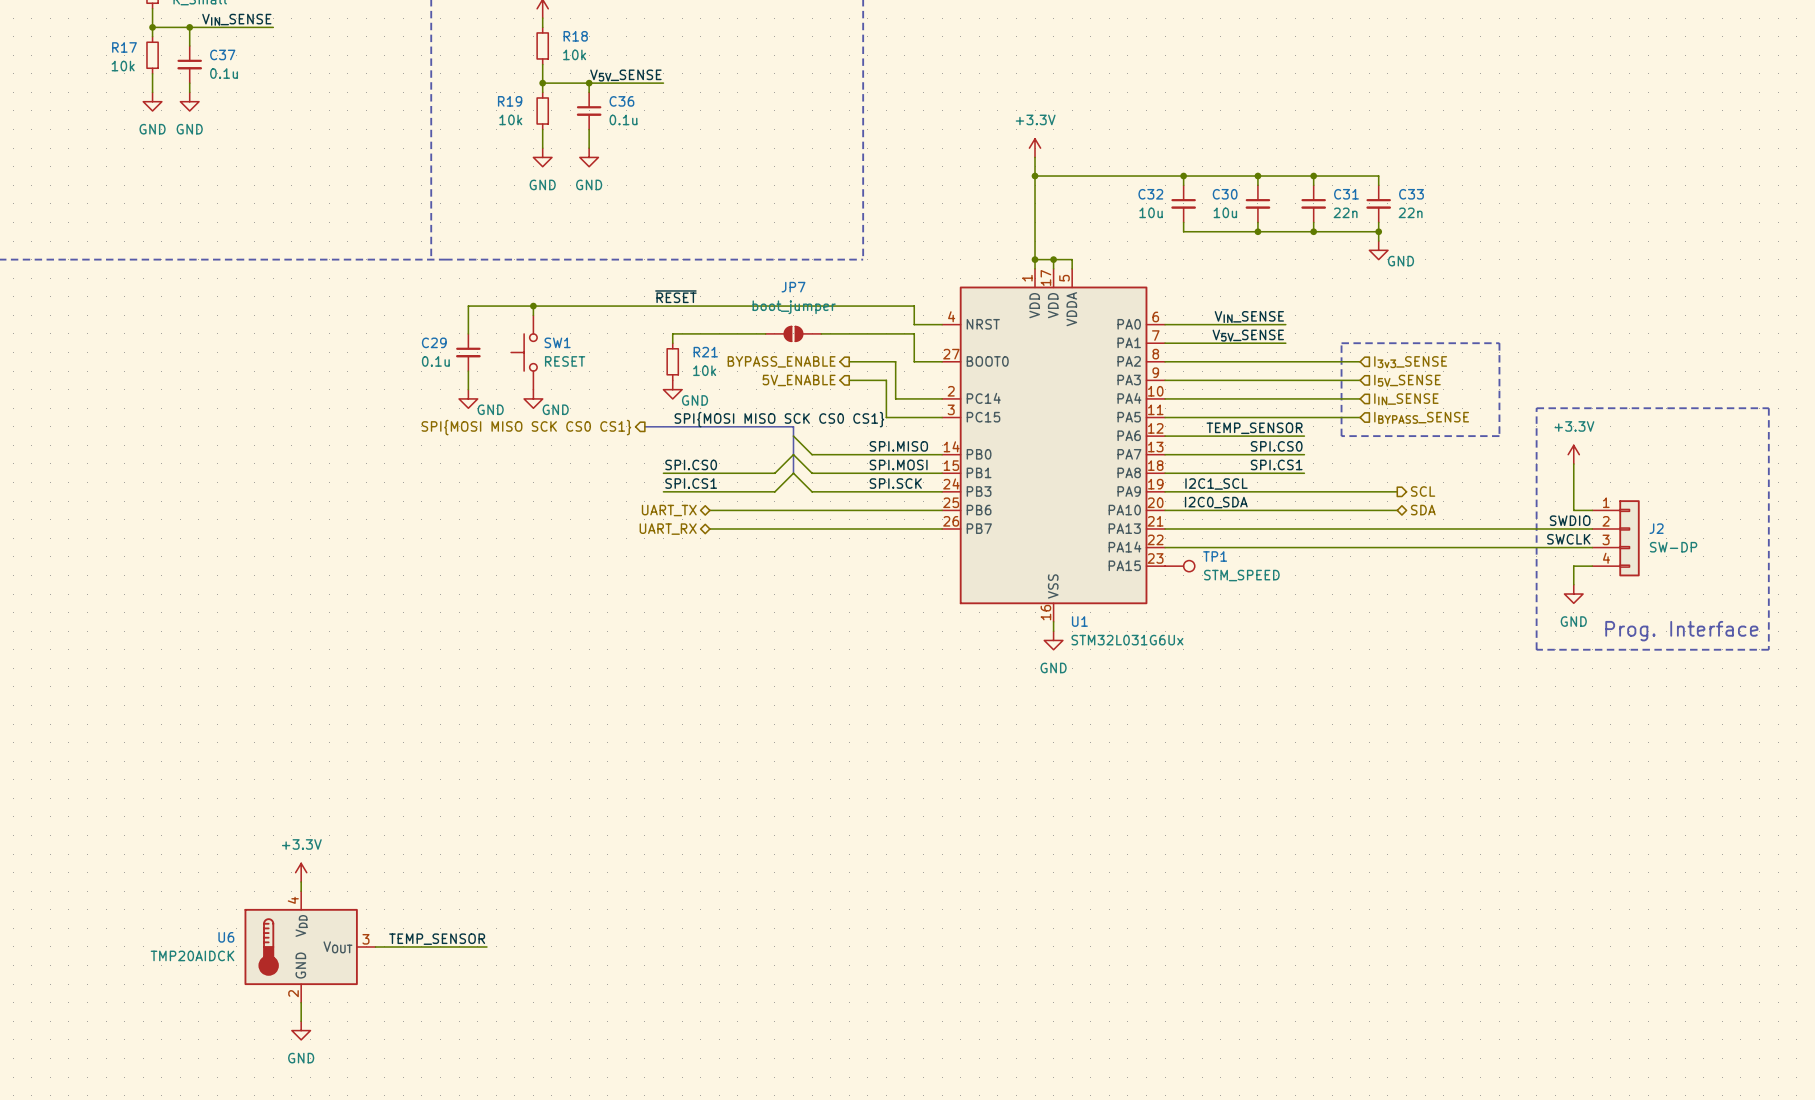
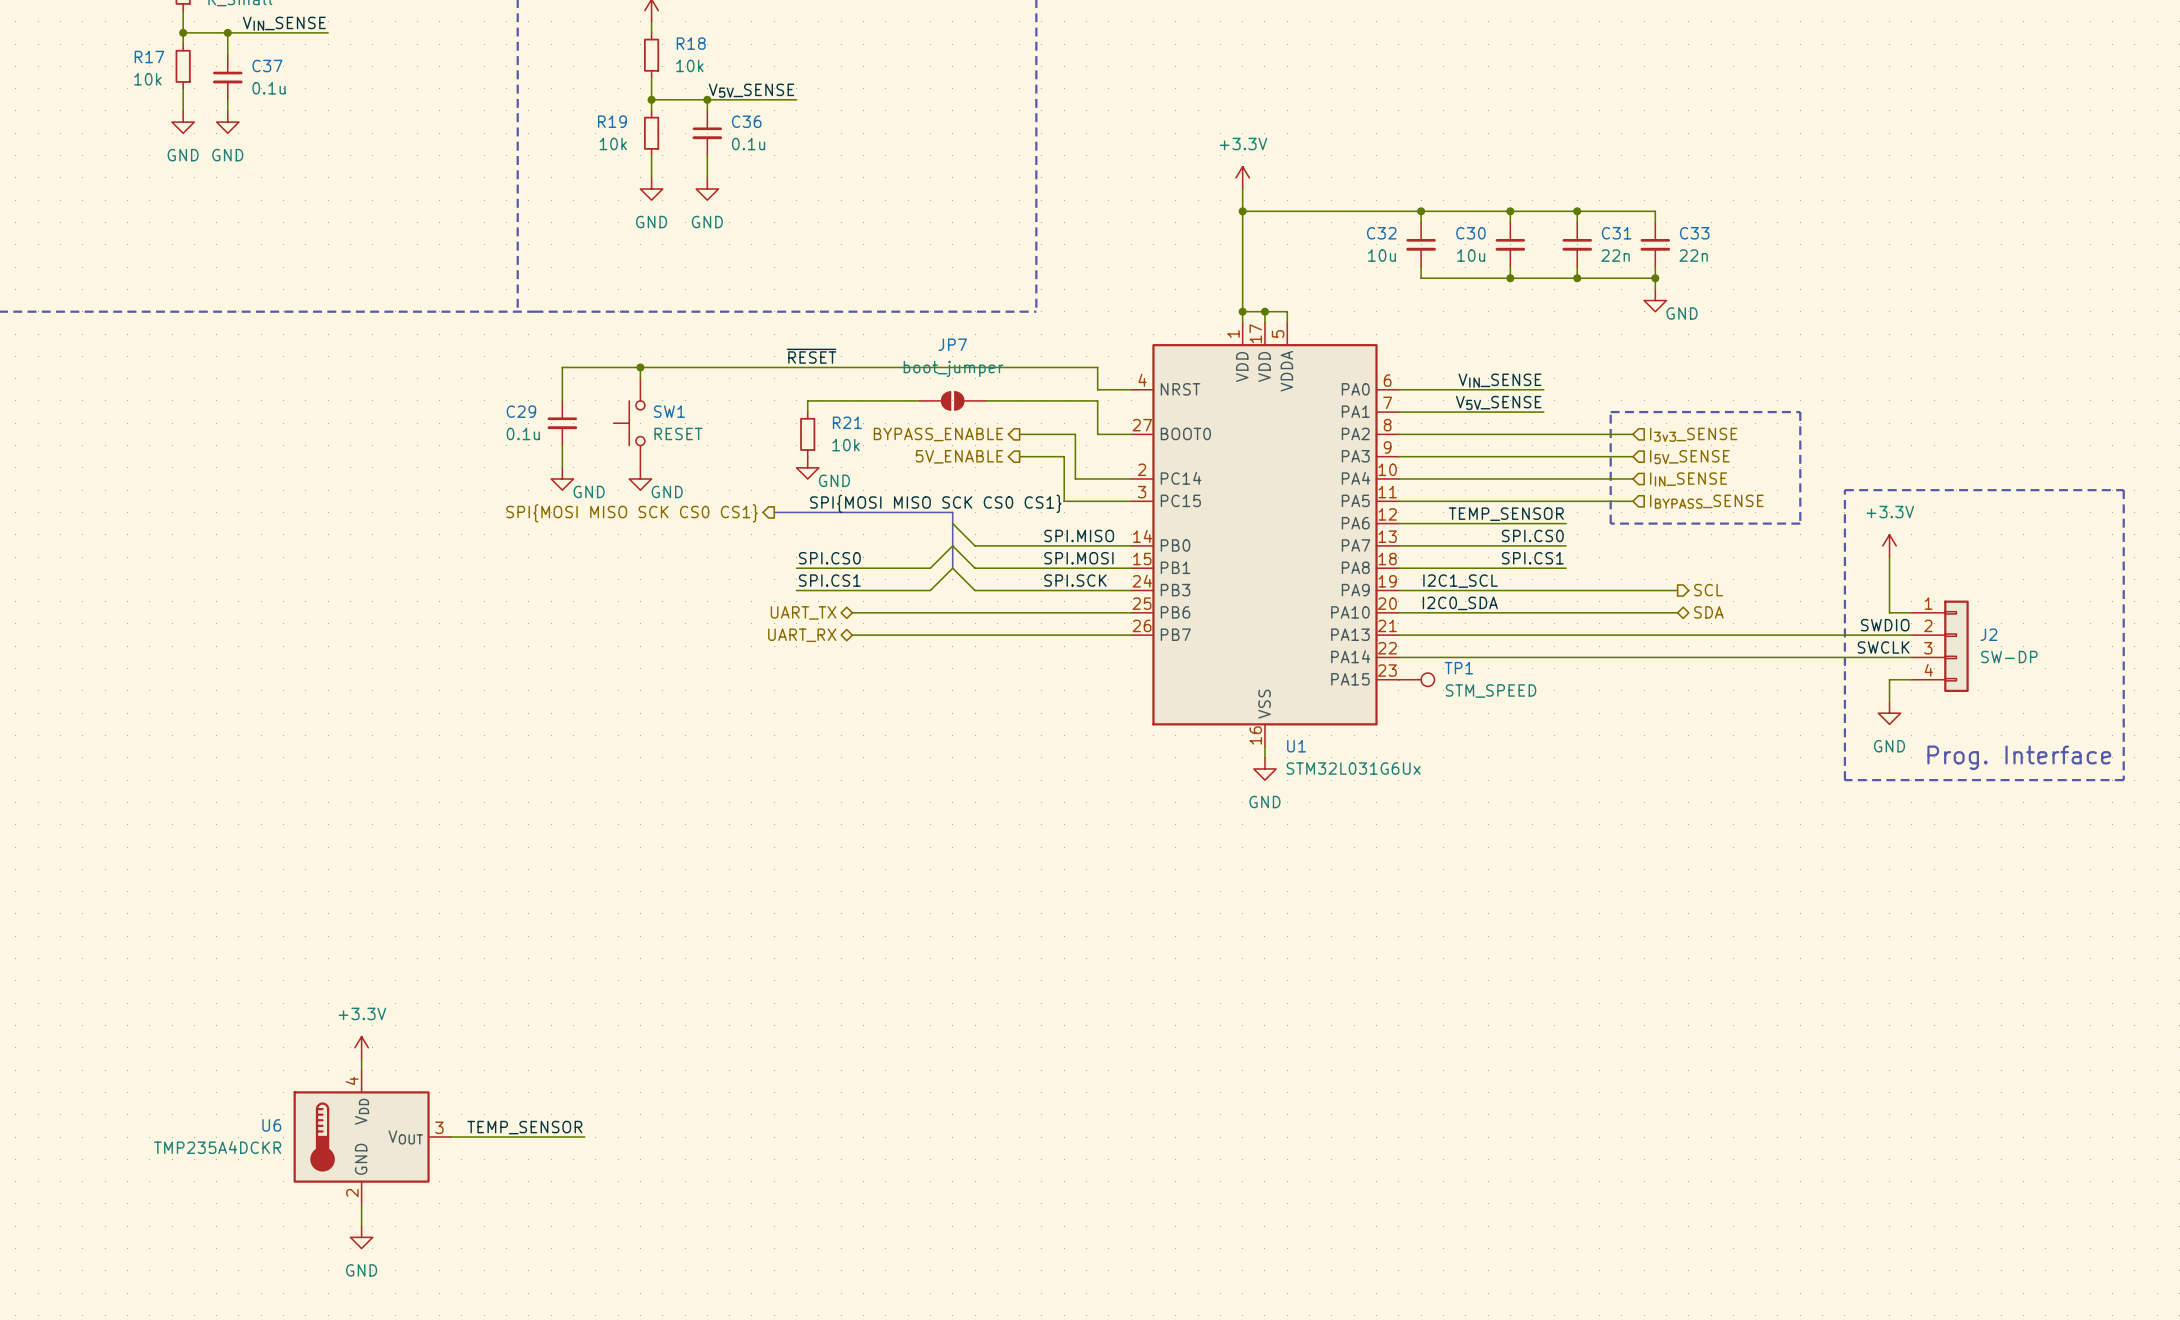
U6 value: TMP20AIDCK (192, 955) -> TMP235A4DCKR (217, 1147)

